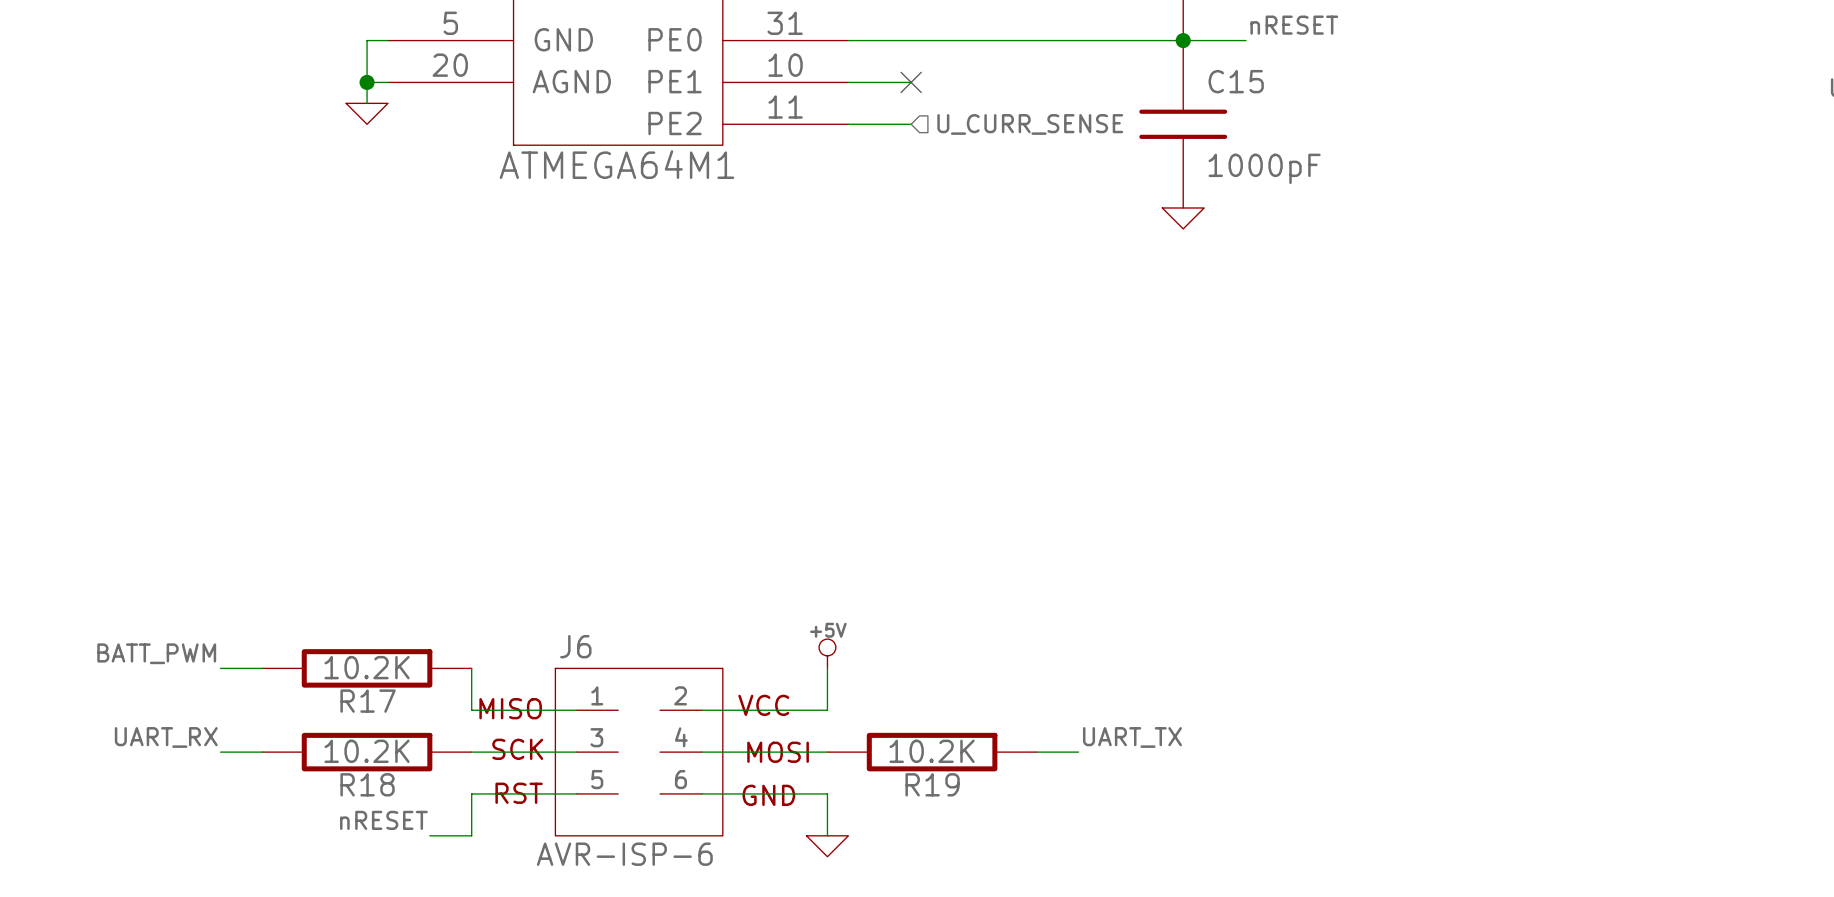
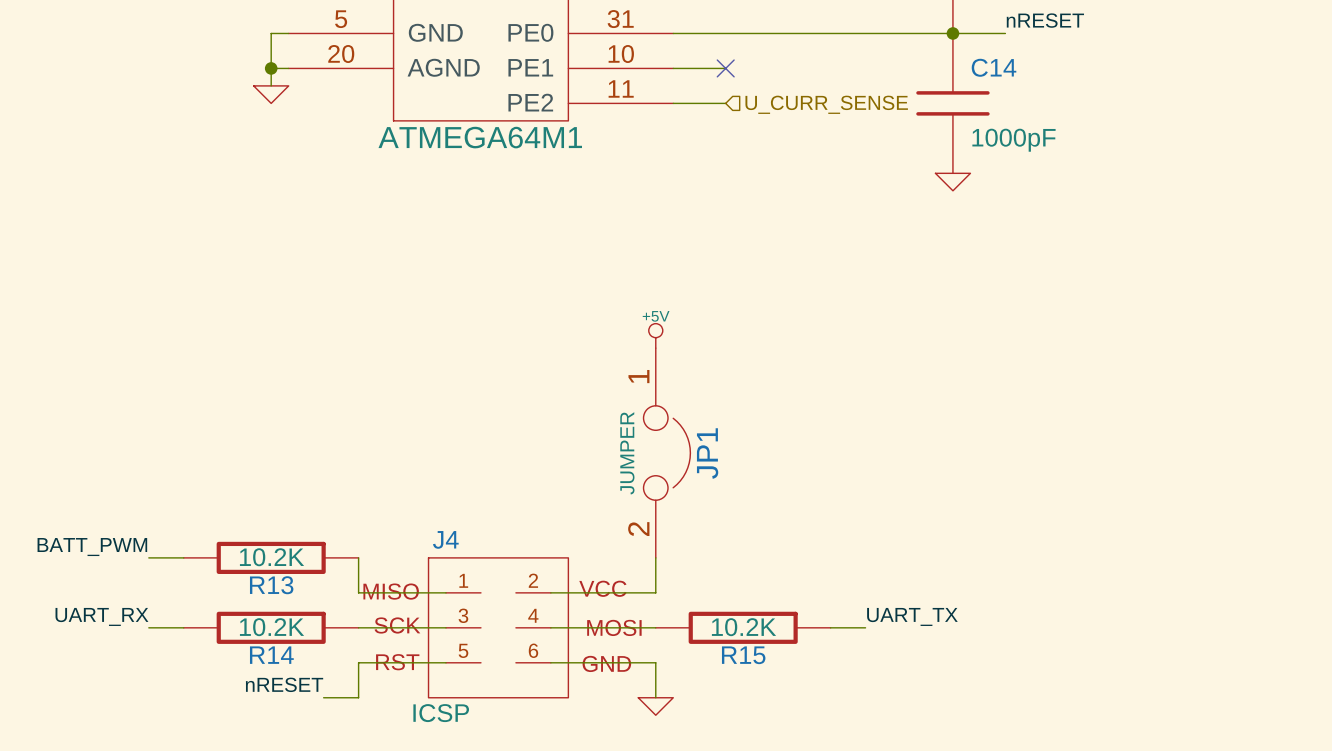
C15 name: C15 (1236, 81) -> C14 (994, 67)
JP1: none -> JUMPER (666, 453)
J6 name: J6 (575, 646) -> J4 (445, 539)
power symbol position: +5V (827, 653) -> +5V (655, 335)
R17 name: R17 (368, 701) -> R13 (271, 585)
R18 name: R18 (367, 784) -> R14 (271, 655)
R19 name: R19 (932, 784) -> R15 (743, 655)
J6 value: AVR-ISP-6 (624, 854) -> ICSP (441, 713)

